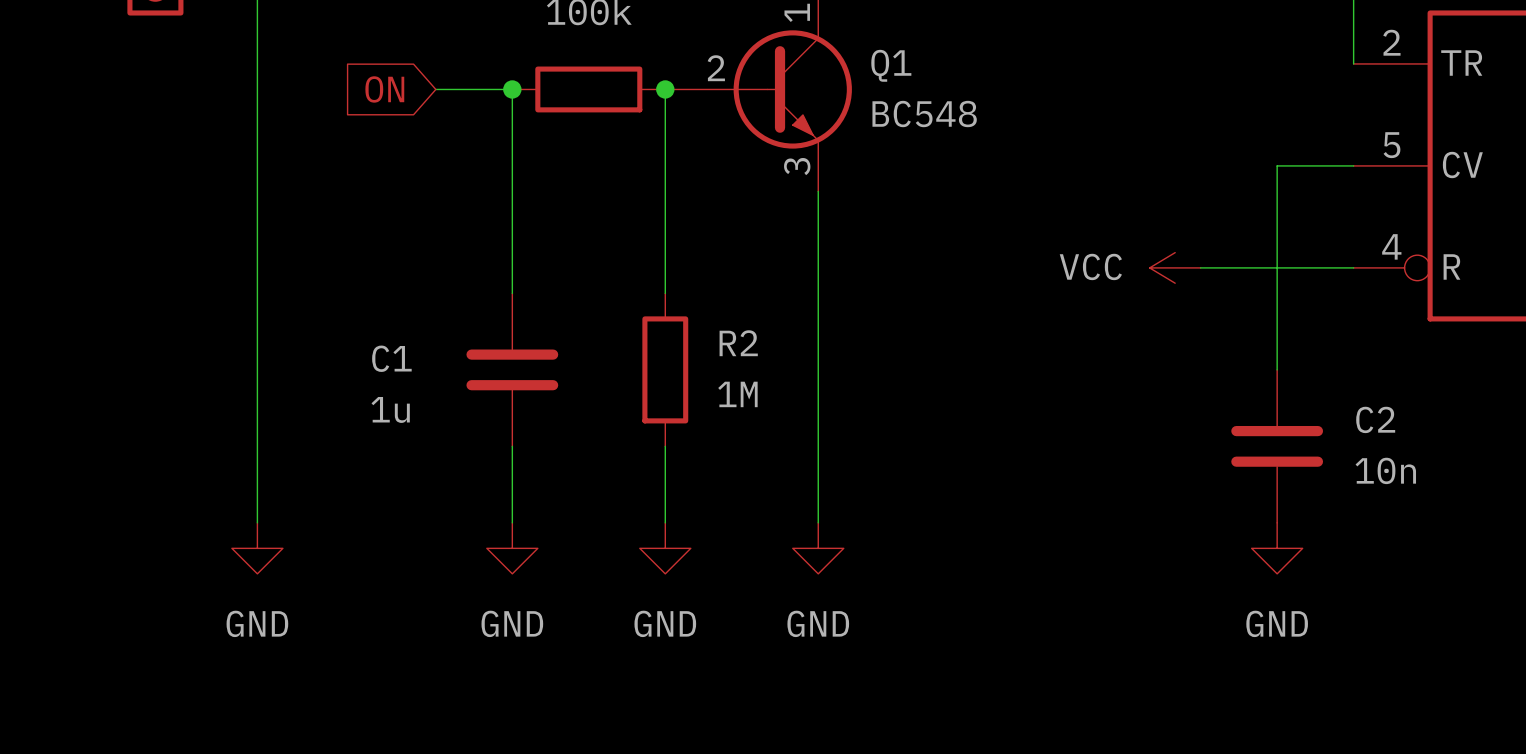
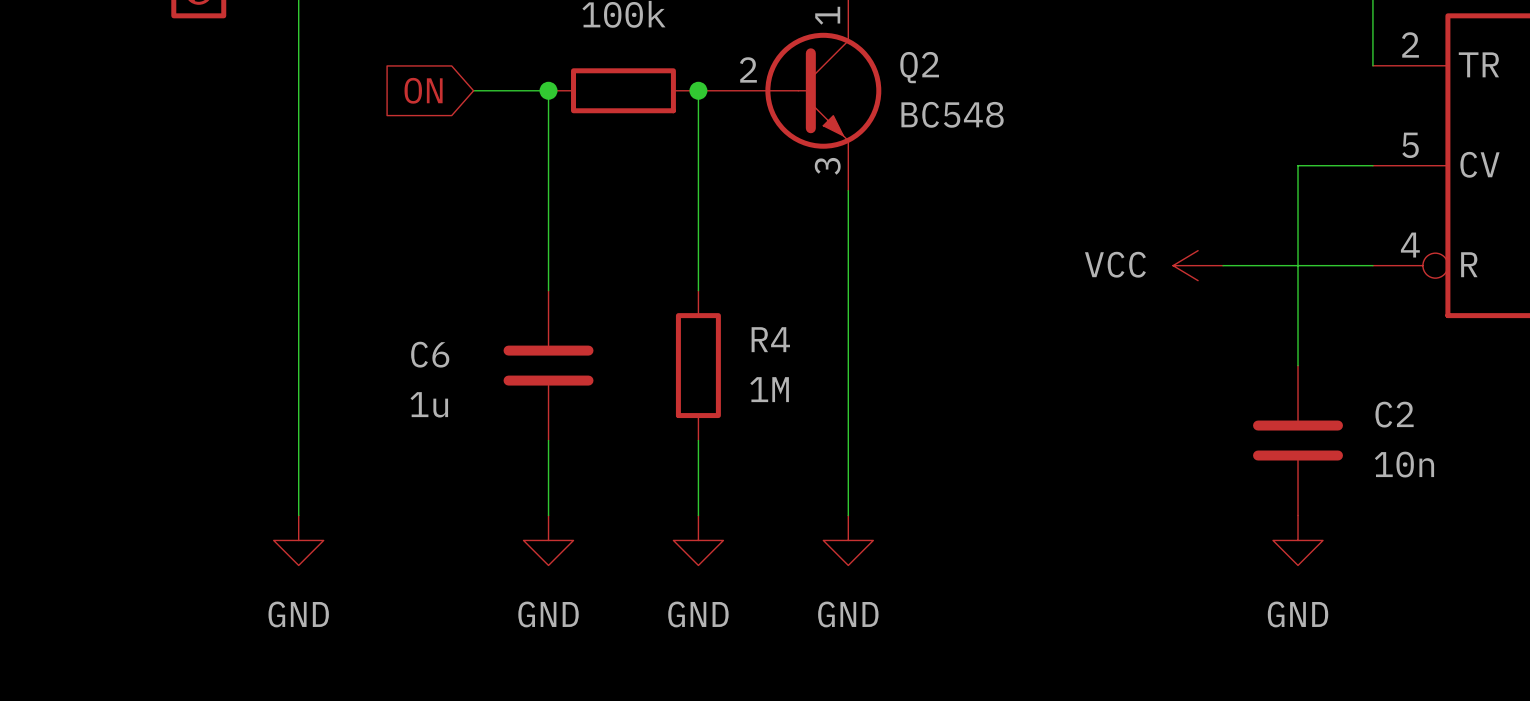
Q1 name: Q1 (891, 65) -> Q2 (919, 67)
R2 name: R2 (738, 343) -> R4 (770, 339)
C1 name: C1 (391, 358) -> C6 (430, 354)

